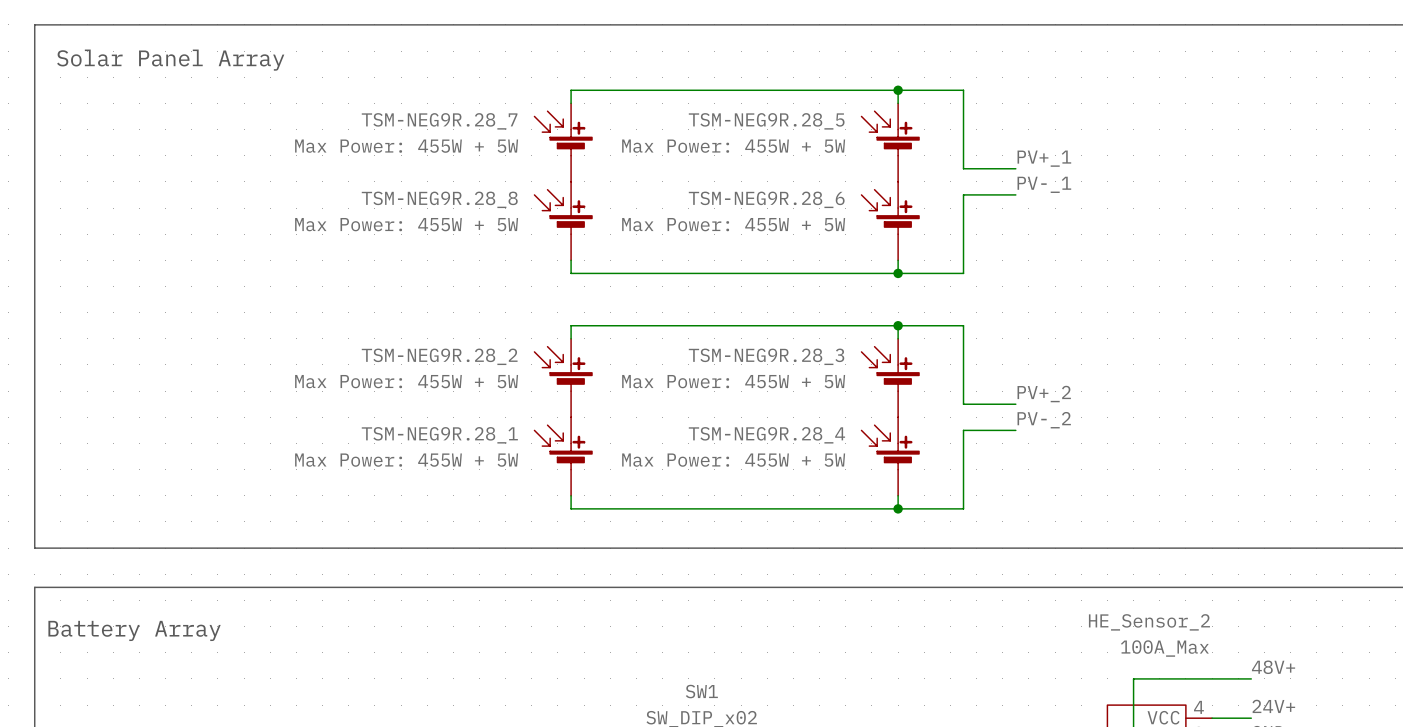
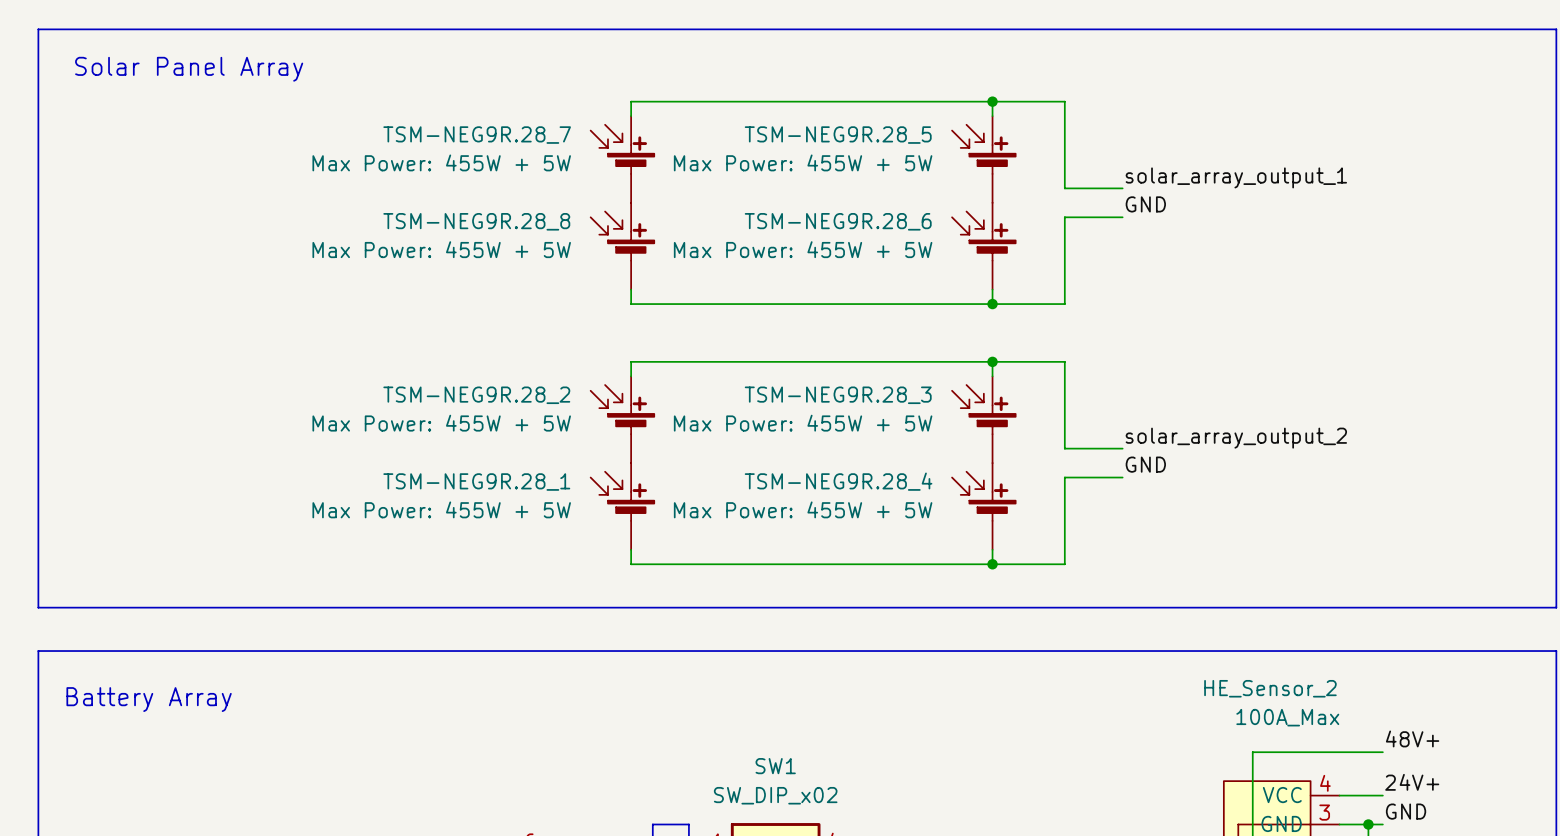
label: PV+_1 (1044, 158) -> solar_array_output_1 (1236, 177)
label: PV-_1 (1044, 184) -> GND (1145, 204)
label: PV+_2 (1044, 394) -> solar_array_output_2 (1236, 438)
label: PV-_2 (1044, 420) -> GND (1145, 464)

